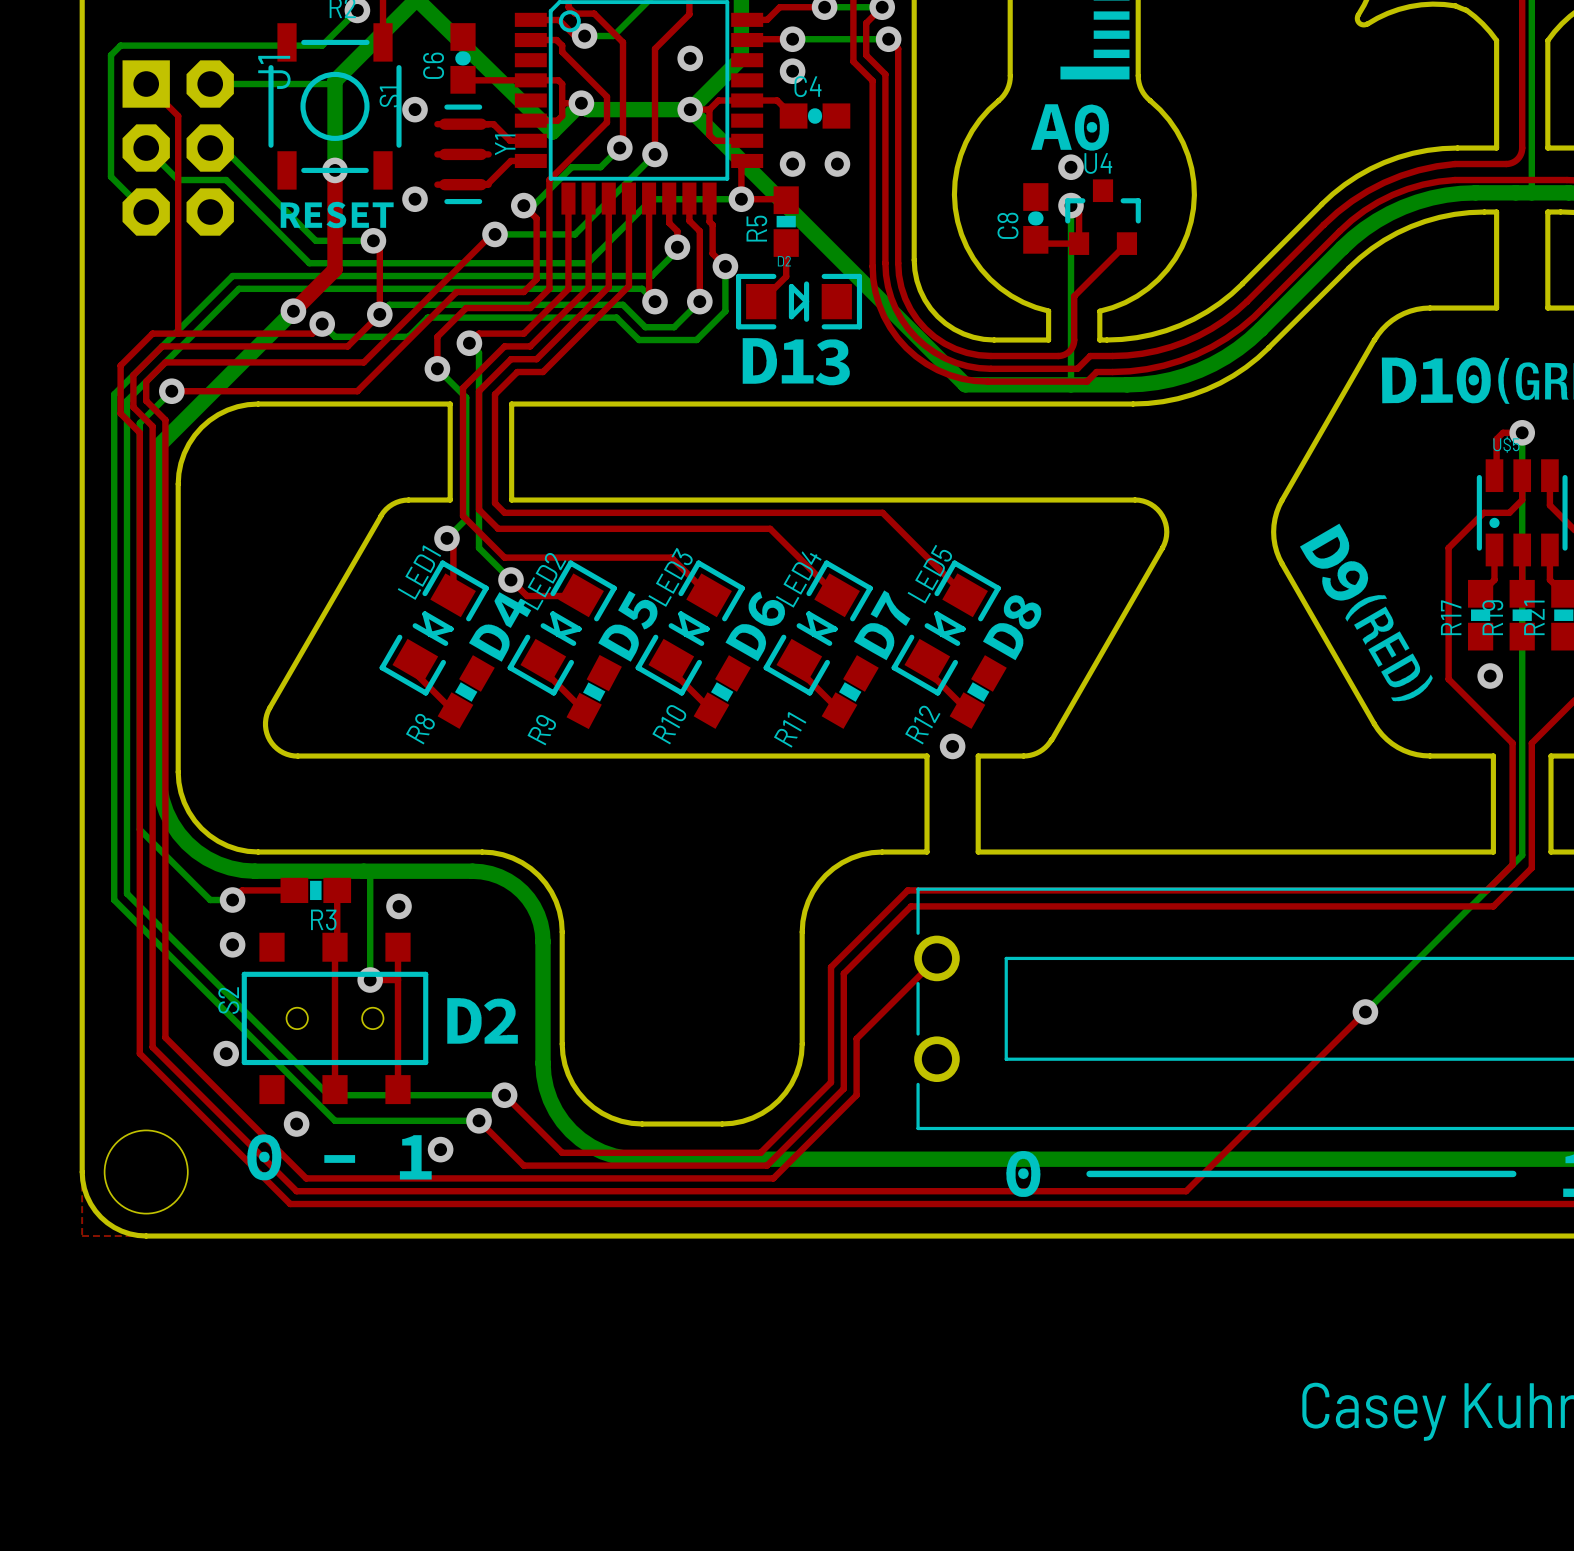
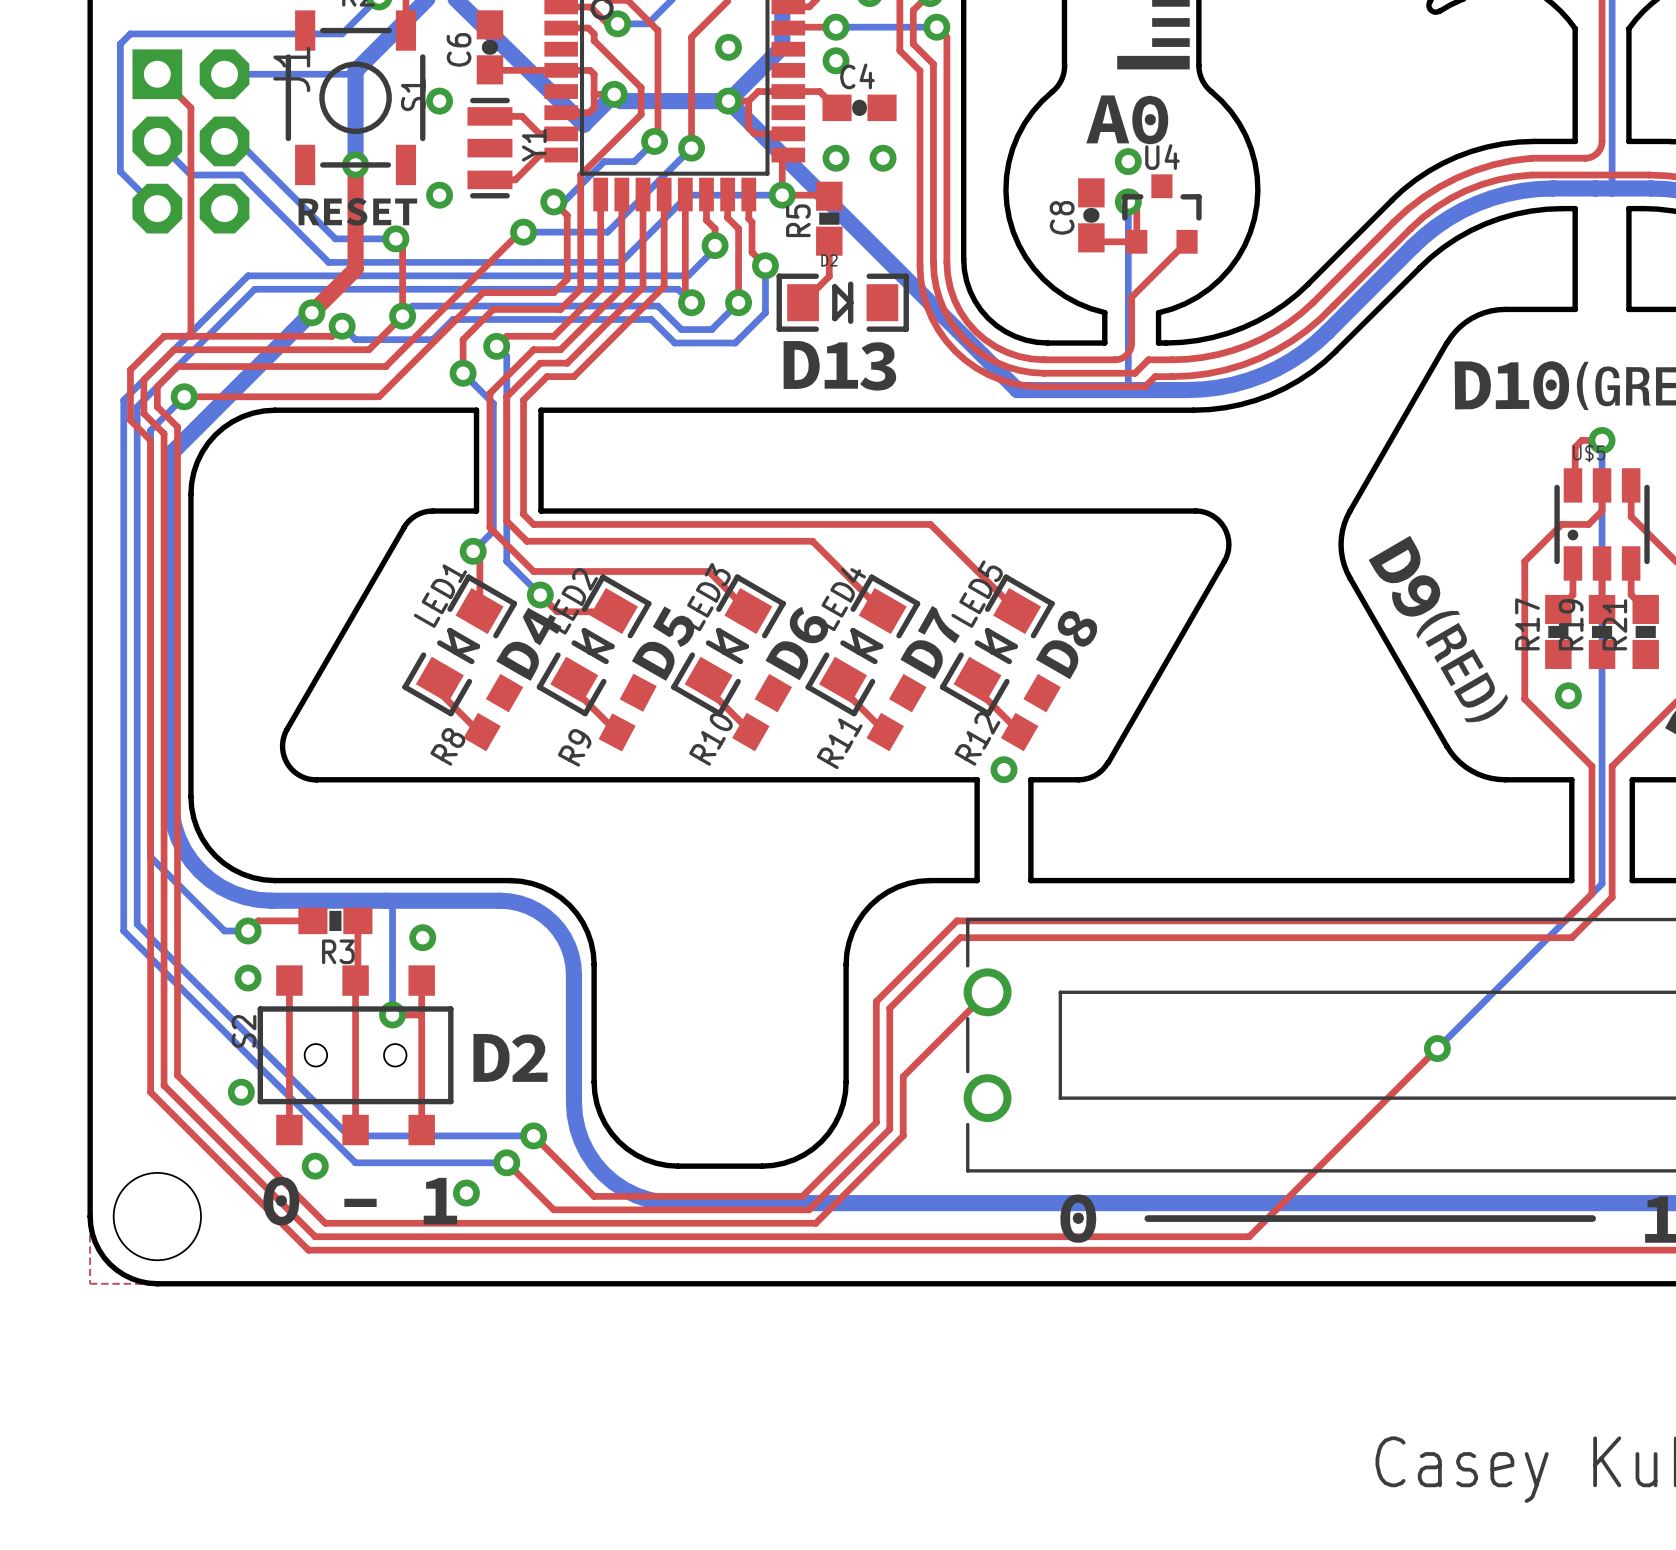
Y1 footprint: [434, 104, 492, 205] -> [467, 97, 513, 199]
R9 footprint: [566, 654, 622, 730] -> [598, 673, 657, 752]
R8 footprint: [437, 655, 495, 729] -> [463, 673, 524, 752]
R10 footprint: [693, 655, 751, 729] -> [732, 673, 793, 752]
R11 footprint: [821, 655, 879, 729] -> [866, 673, 927, 752]
R12 footprint: [949, 655, 1007, 729] -> [1000, 673, 1061, 752]
top track: none -> (289, 980) (289, 1130)

